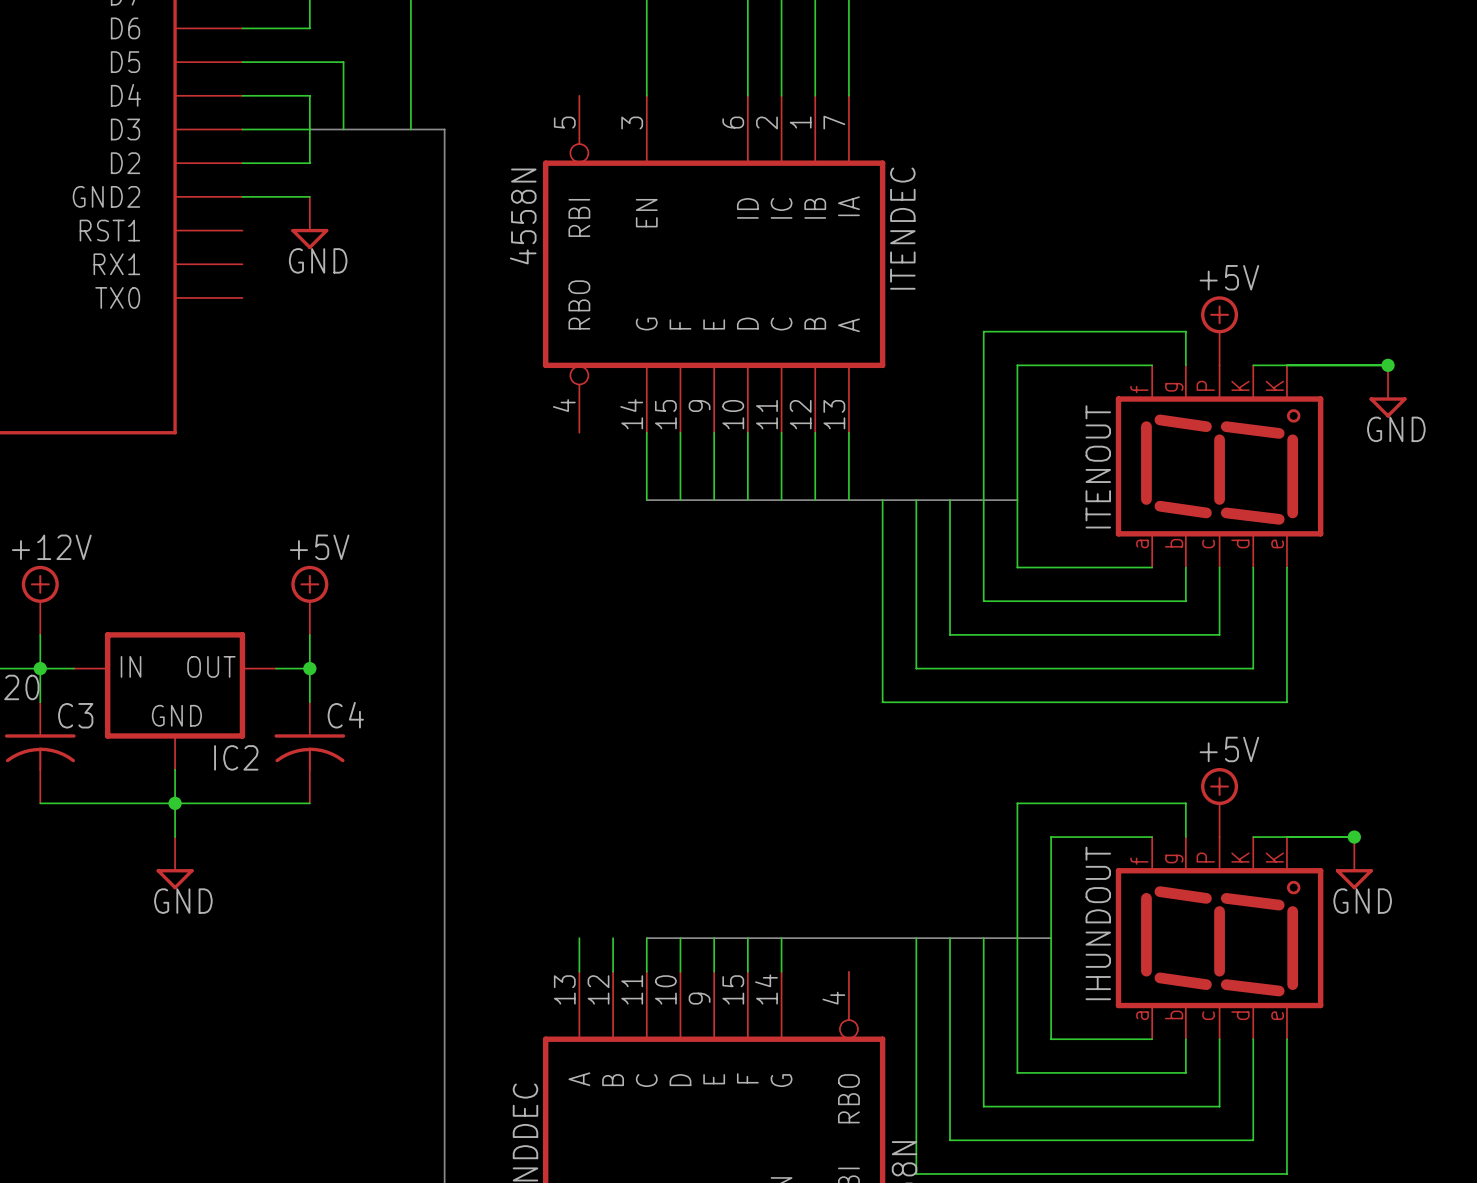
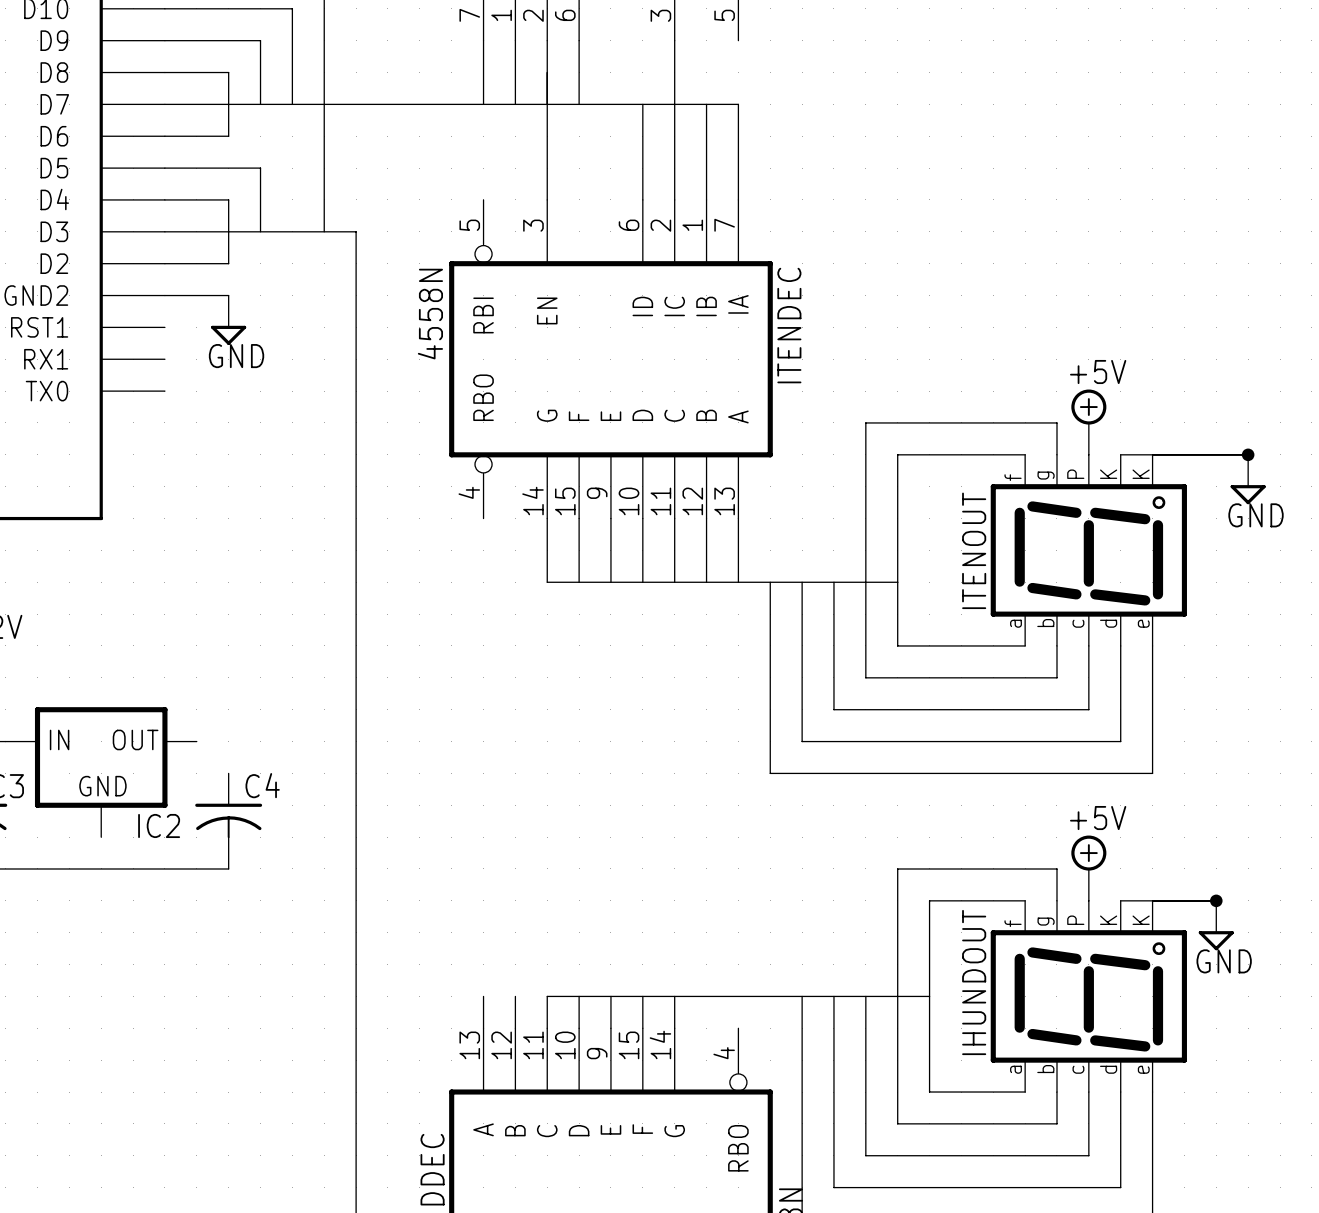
power symbol: +5V (309, 600) -> none
wire: (309, 634) (309, 702) -> none
wire: (276, 668) (309, 668) -> none
junction: (309, 668) -> none
wire: (175, 769) (175, 837) -> none
junction: (175, 803) -> none
power symbol: GND (175, 863) -> none

